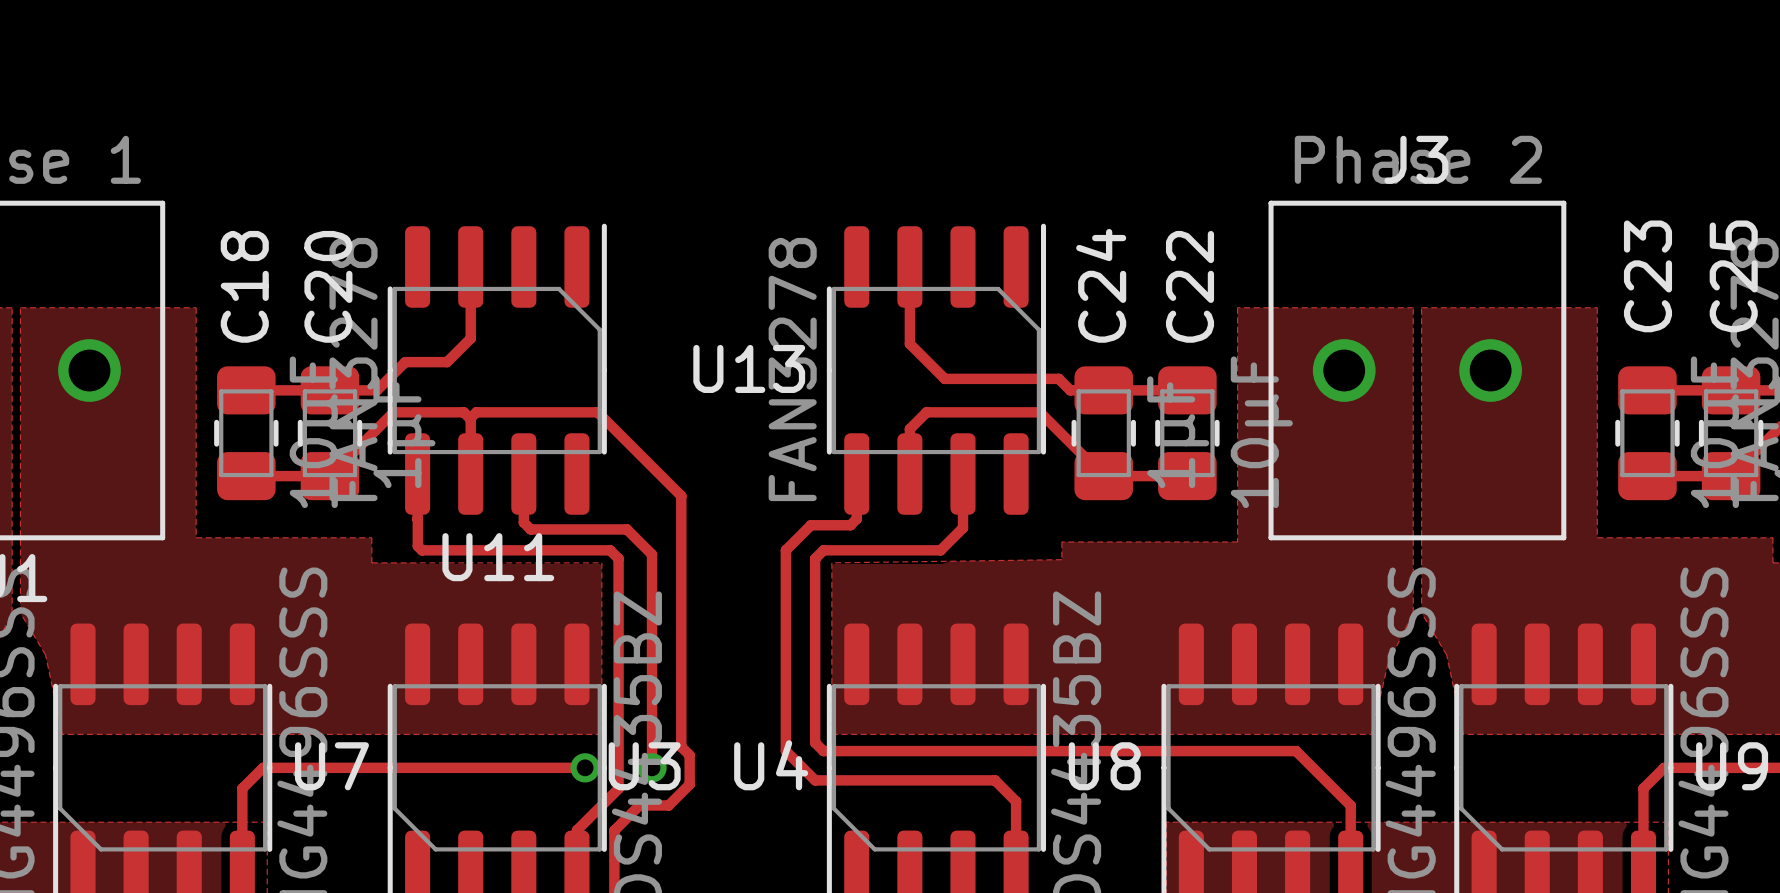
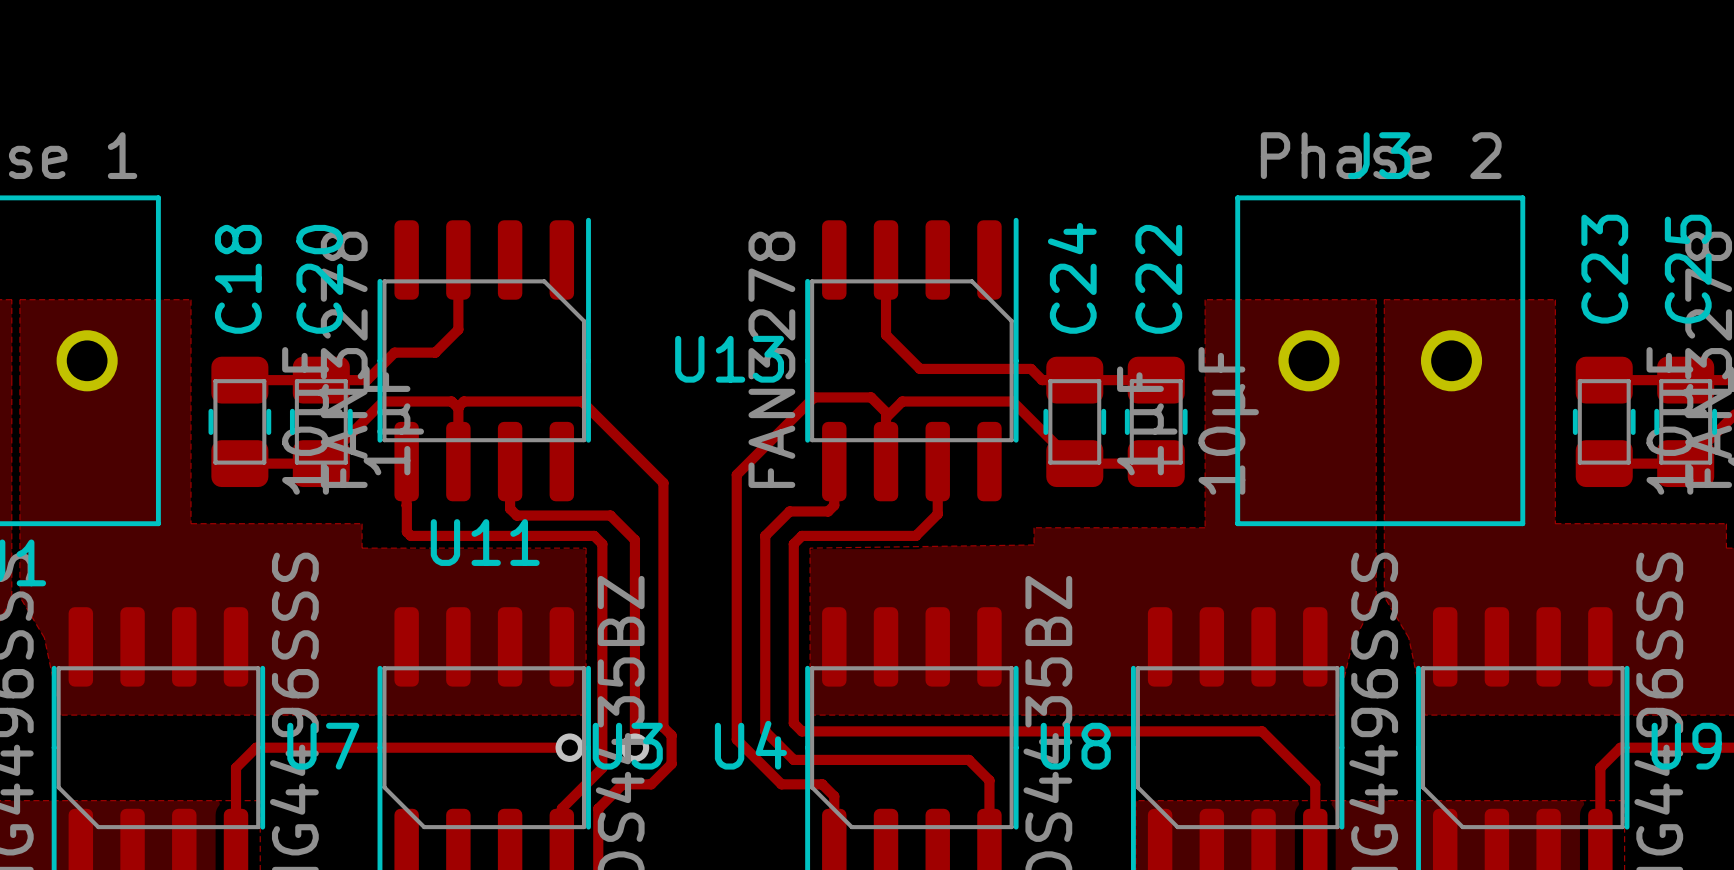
track: none -> (886, 413) (871, 397) (814, 397) (736, 474) (736, 739) (781, 784) (822, 784) (834, 796) (834, 844)

